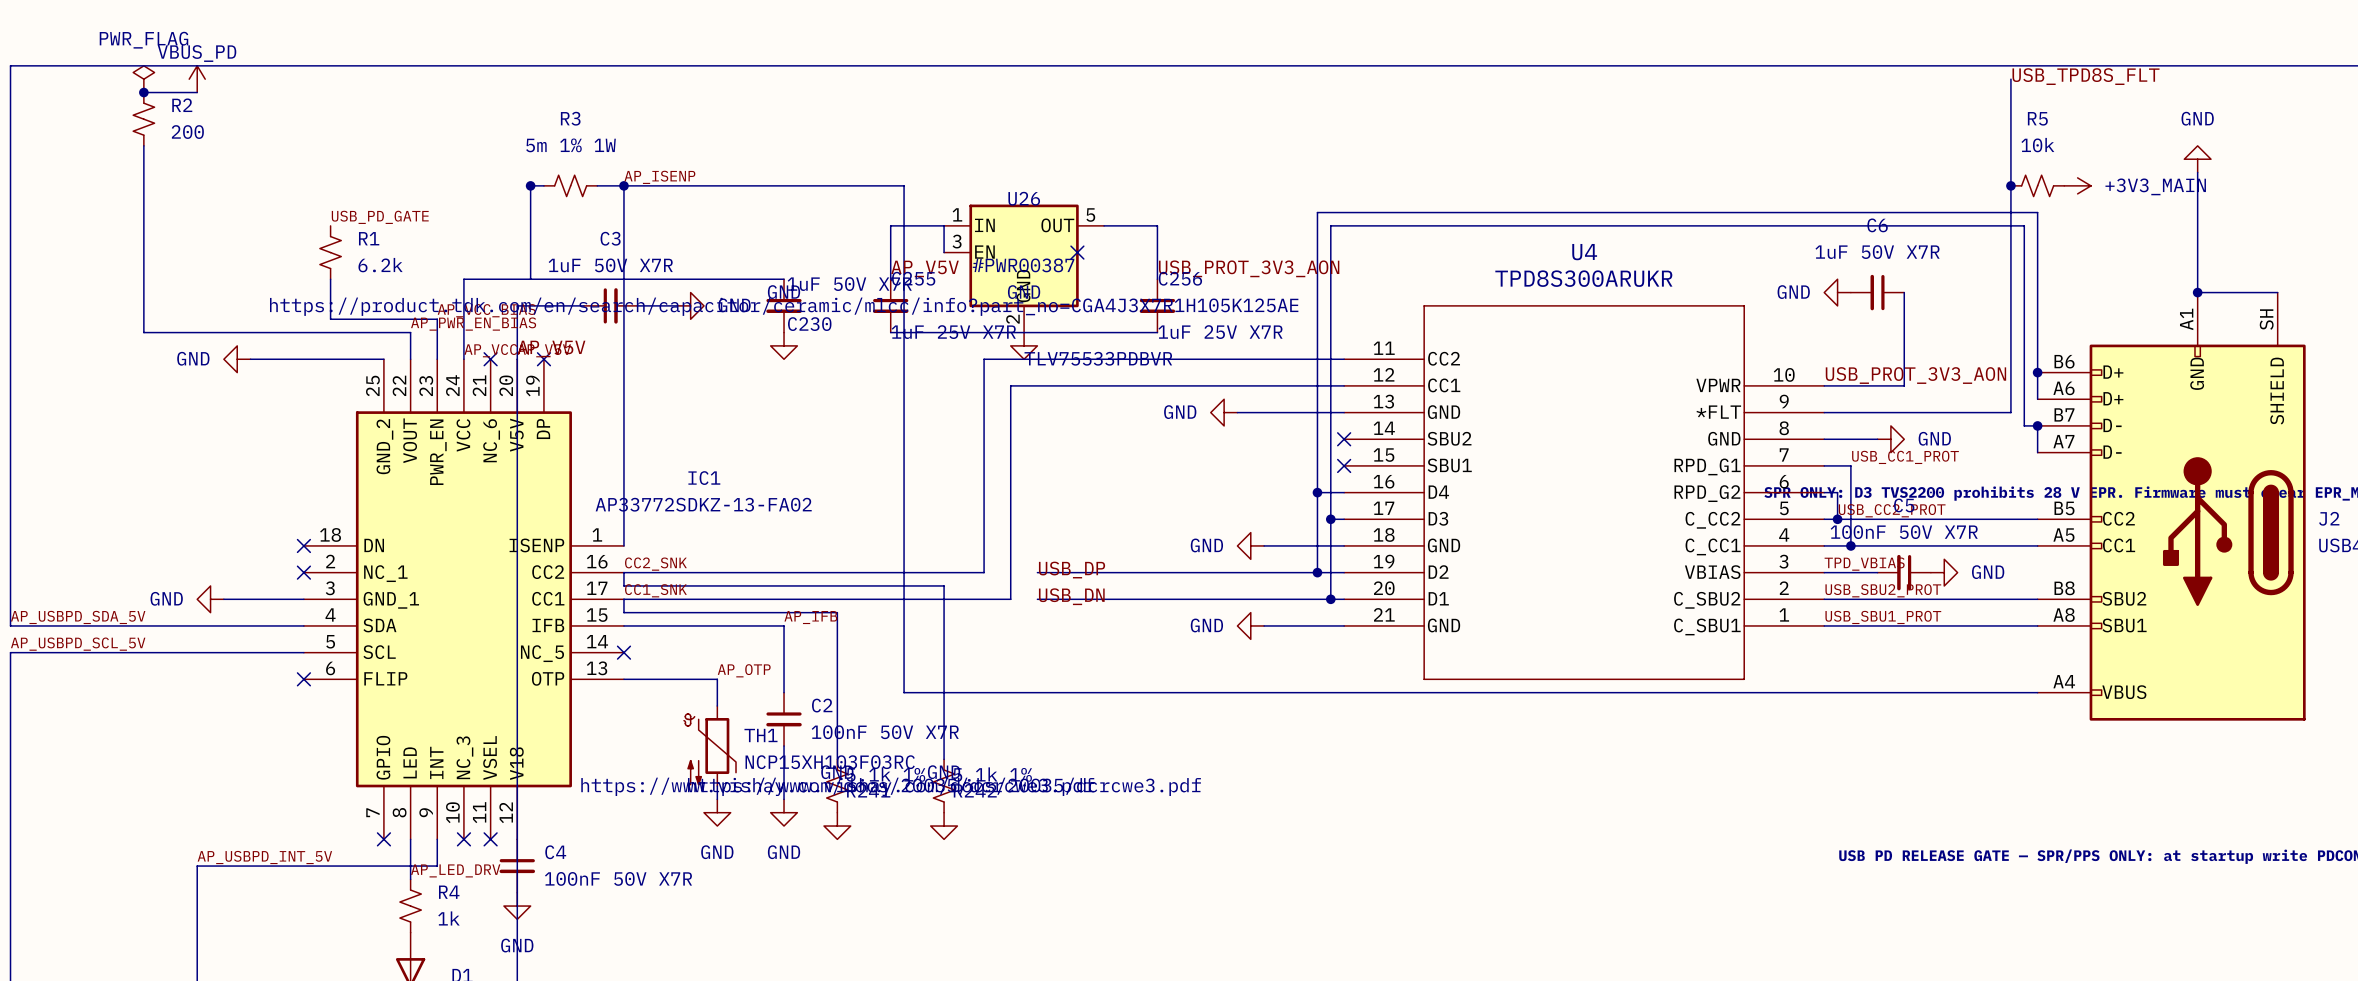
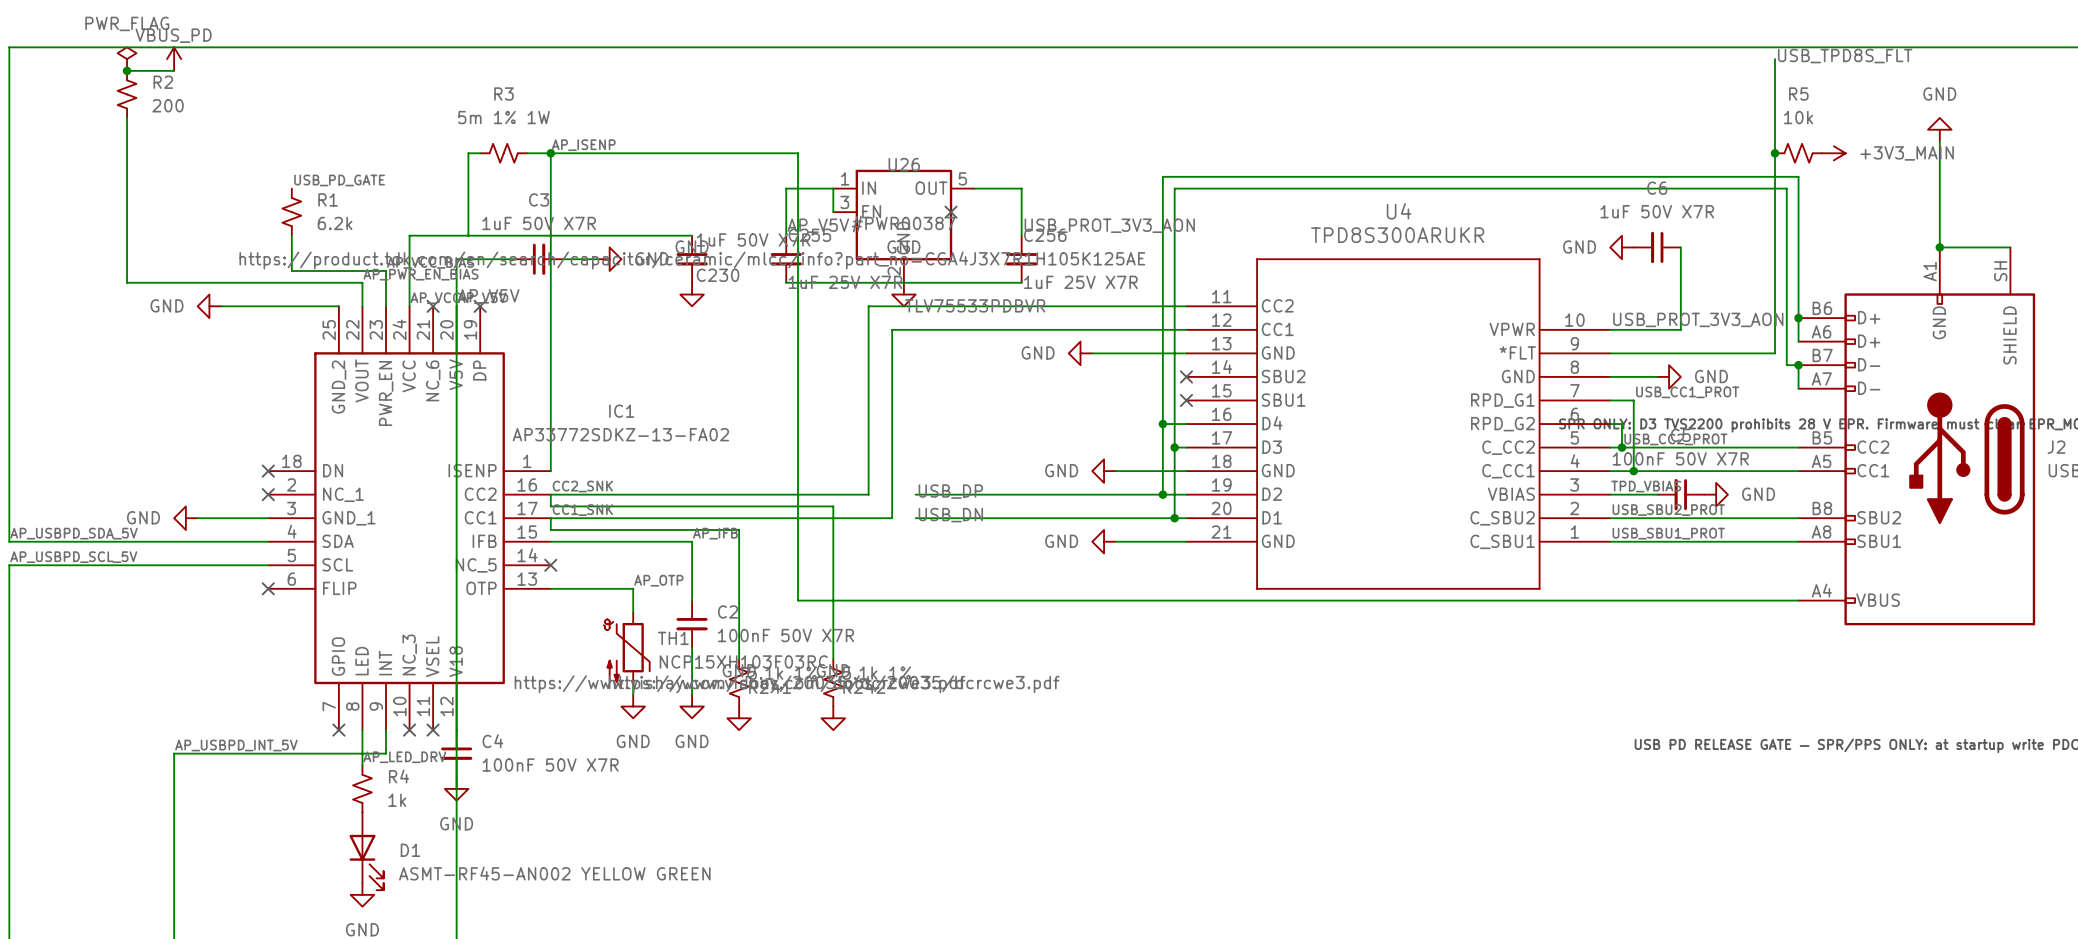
junction: (530, 185) -> none

